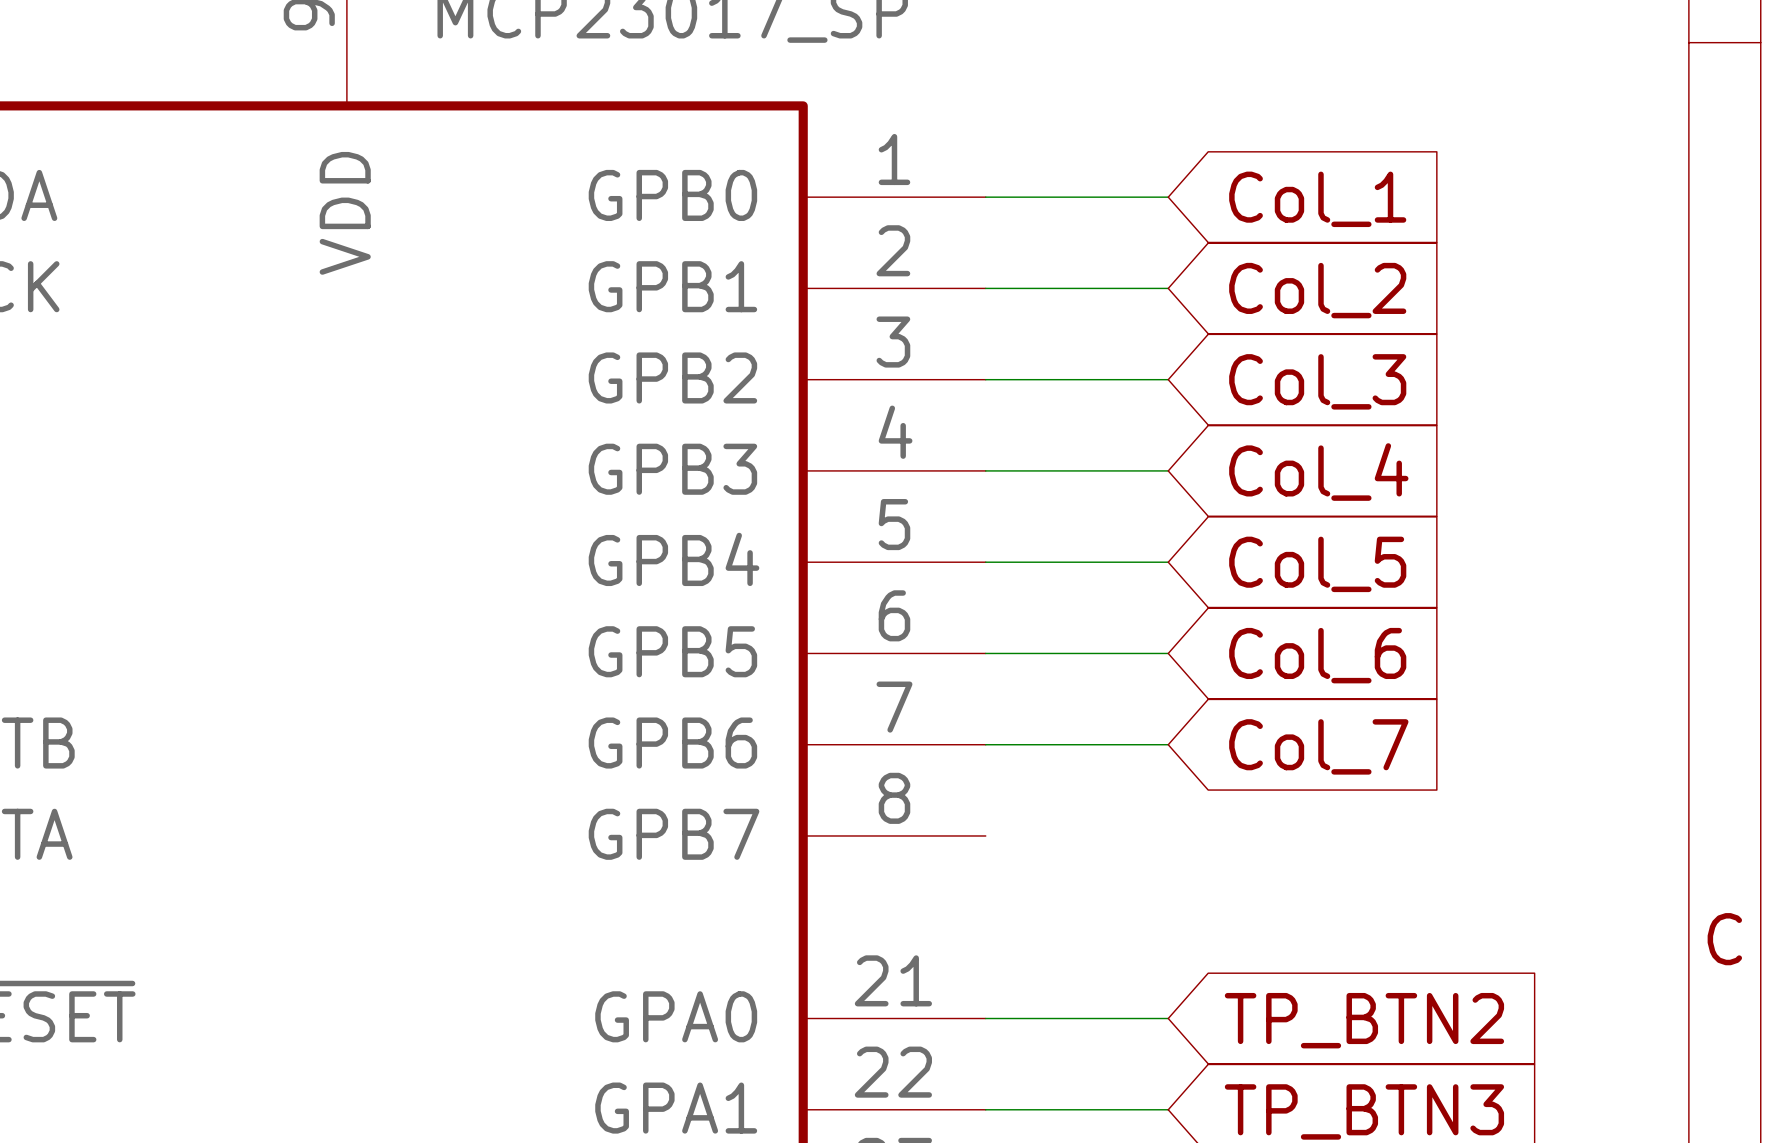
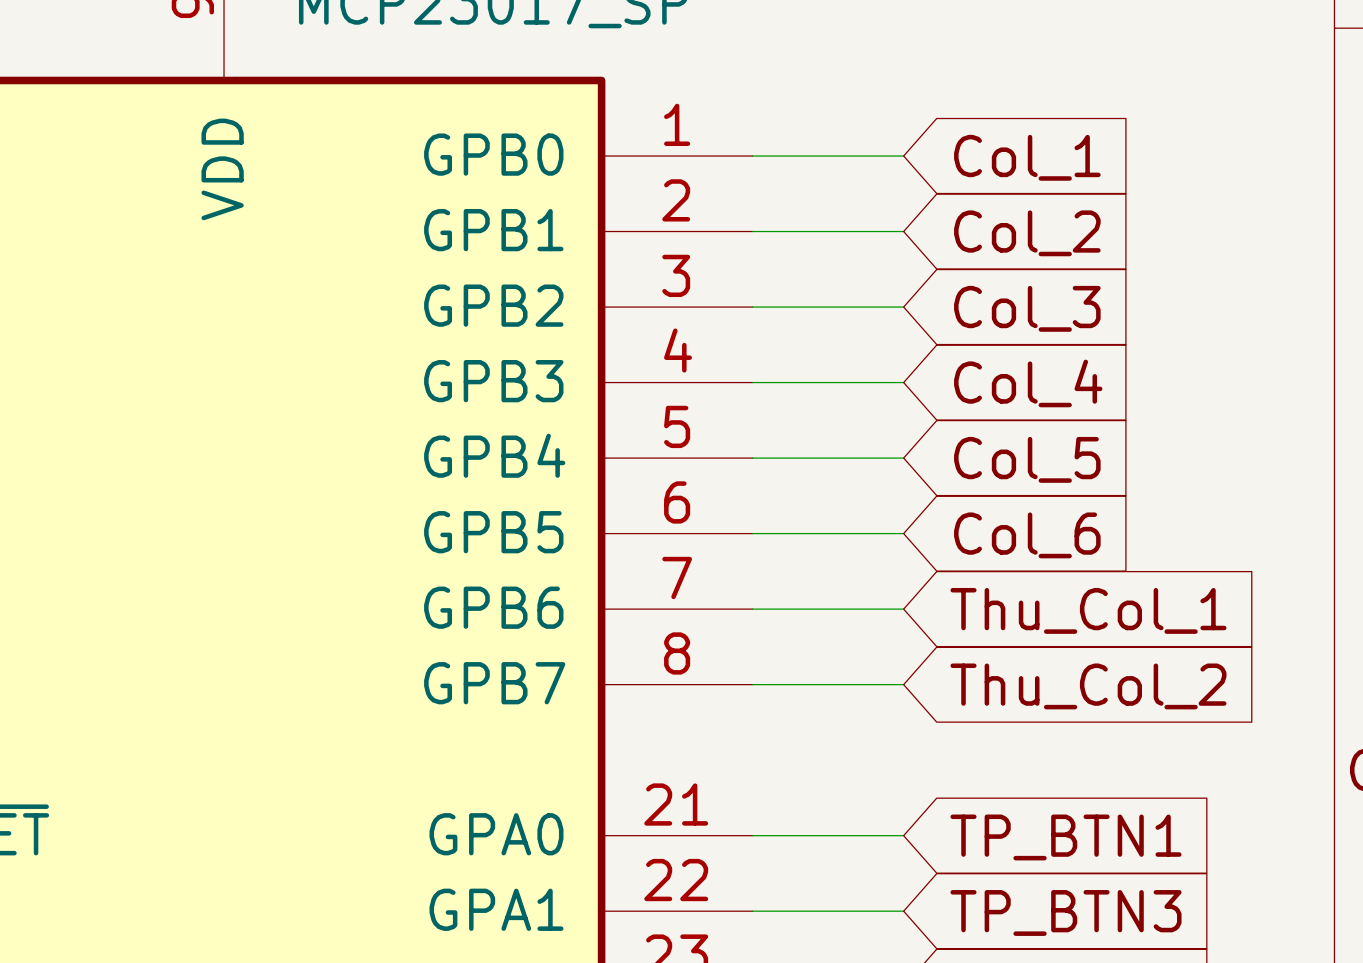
global label: Col_7 (1318, 746) -> Thu_Col_1 (1088, 610)
wire: none -> (752, 684) (903, 684)
global label: none -> Thu_Col_2 (1088, 686)
global label: TP_BTN2 (1364, 1020) -> TP_BTN1 (1066, 837)

